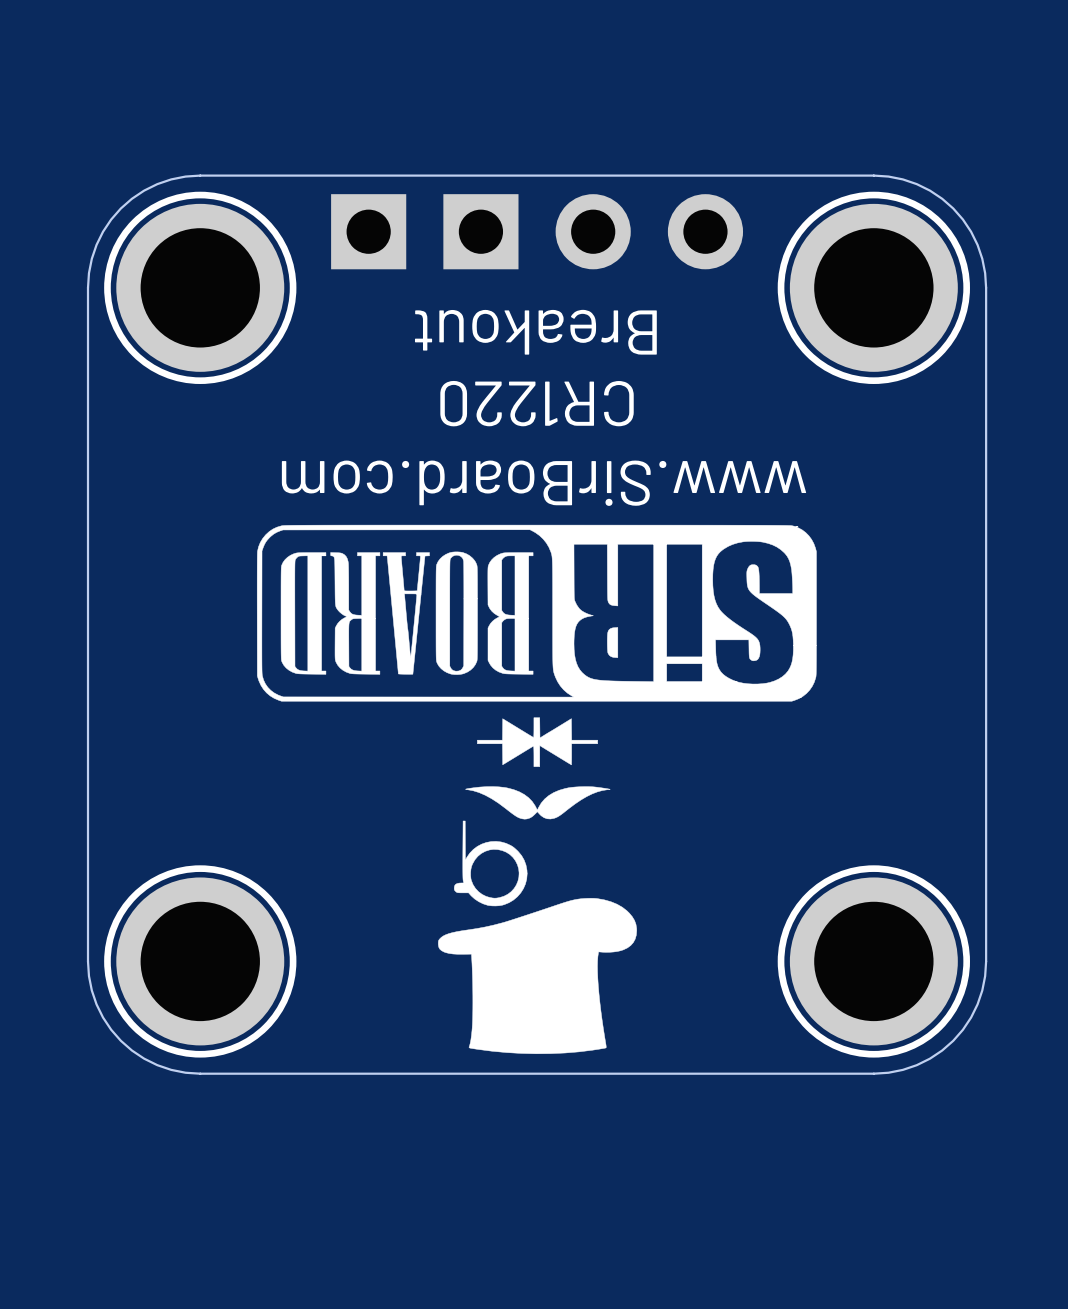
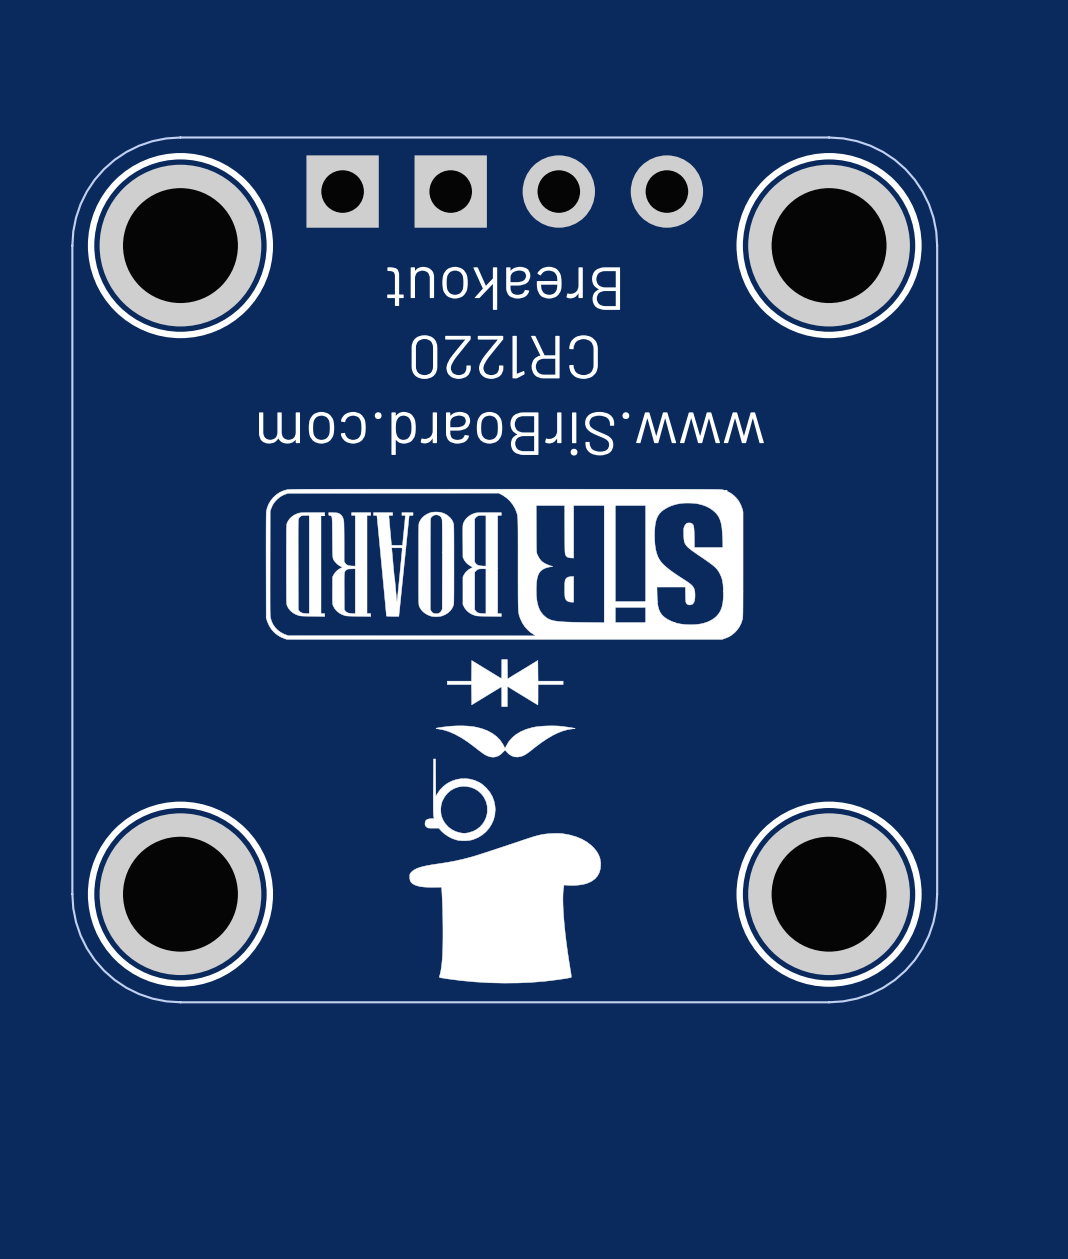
drawing shape: [256, 524, 817, 702] -> [265, 488, 744, 640]

